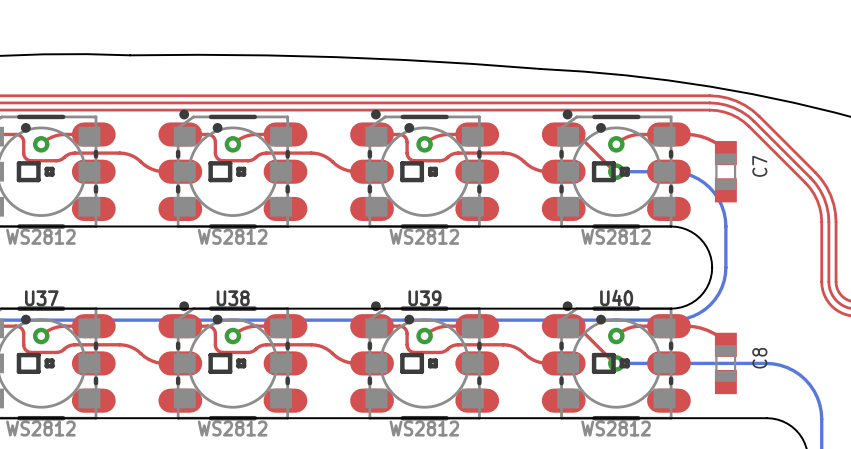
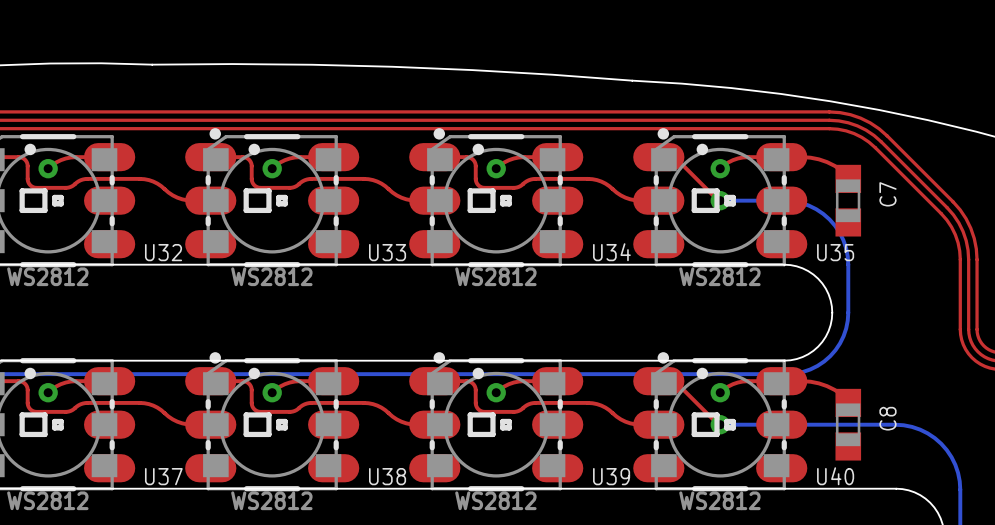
U34 name: none -> U34 (611, 252)
U32 name: none -> U32 (163, 252)
U33 name: none -> U33 (387, 252)
U35 name: none -> U35 (835, 252)
U40 name position: U40 (616, 297) -> U40 (835, 476)
U37 name position: U37 (41, 298) -> U37 (163, 476)
U38 name position: U38 (233, 298) -> U38 (387, 476)
U39 name position: U39 (424, 298) -> U39 (611, 476)

